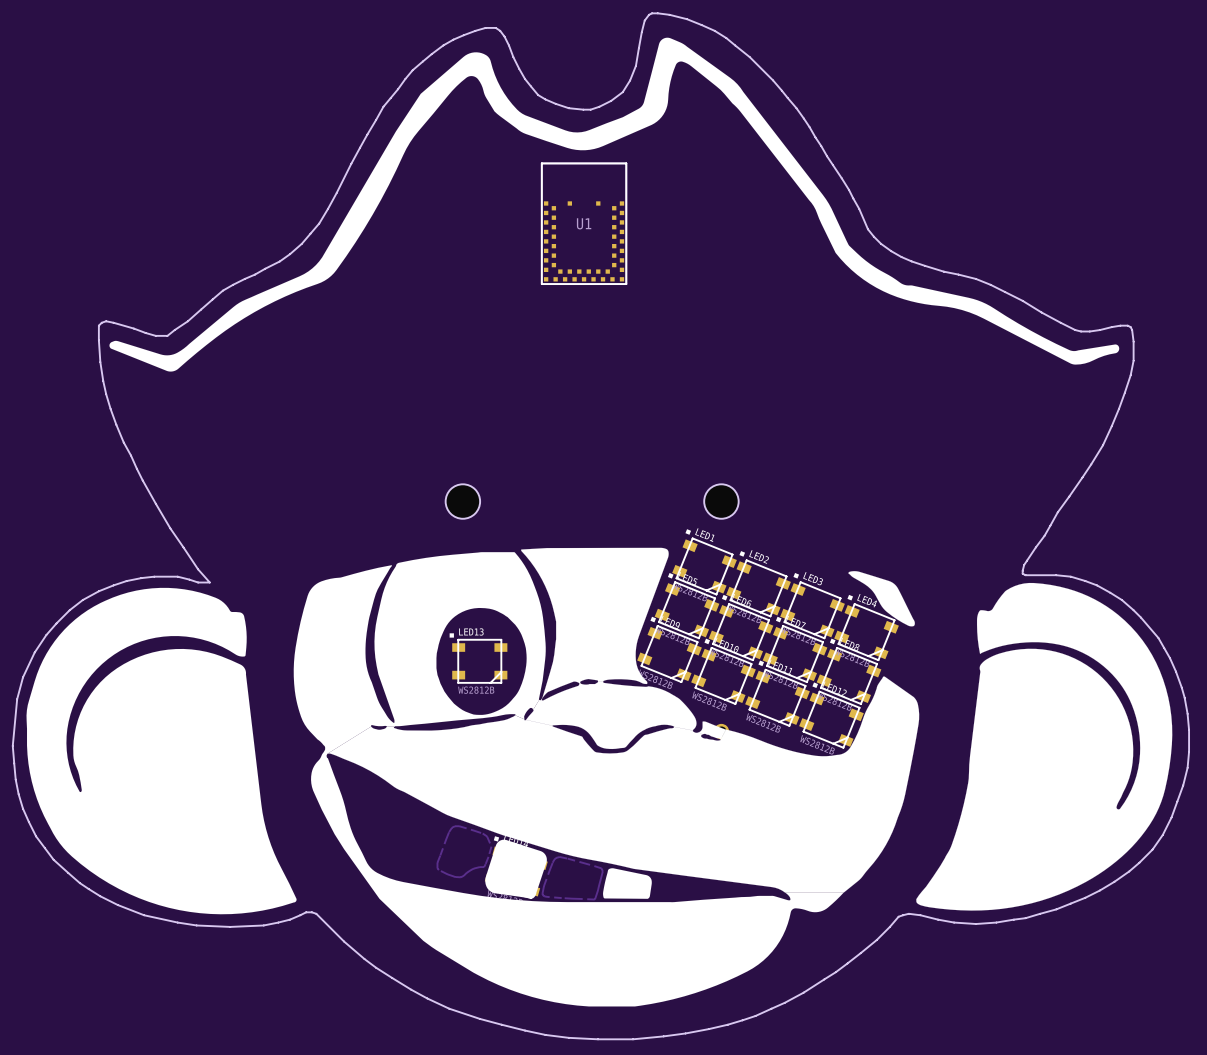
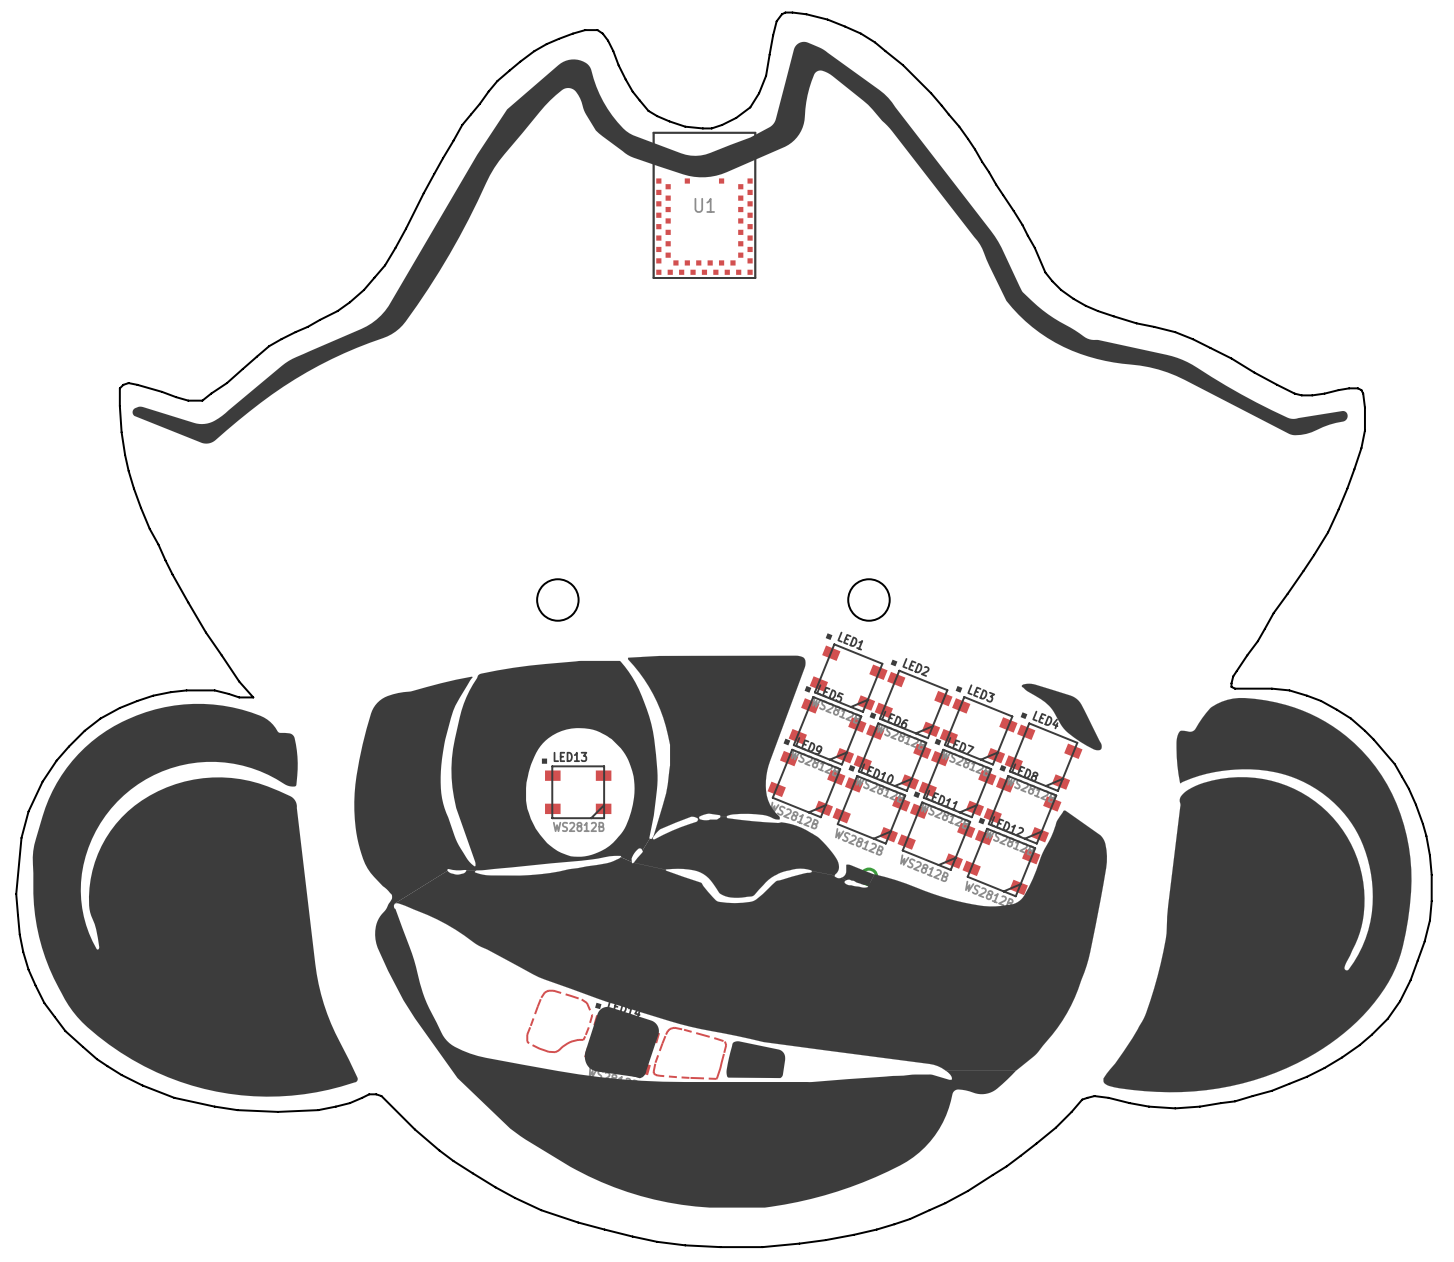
U1 position: (584, 223) -> (704, 205)

